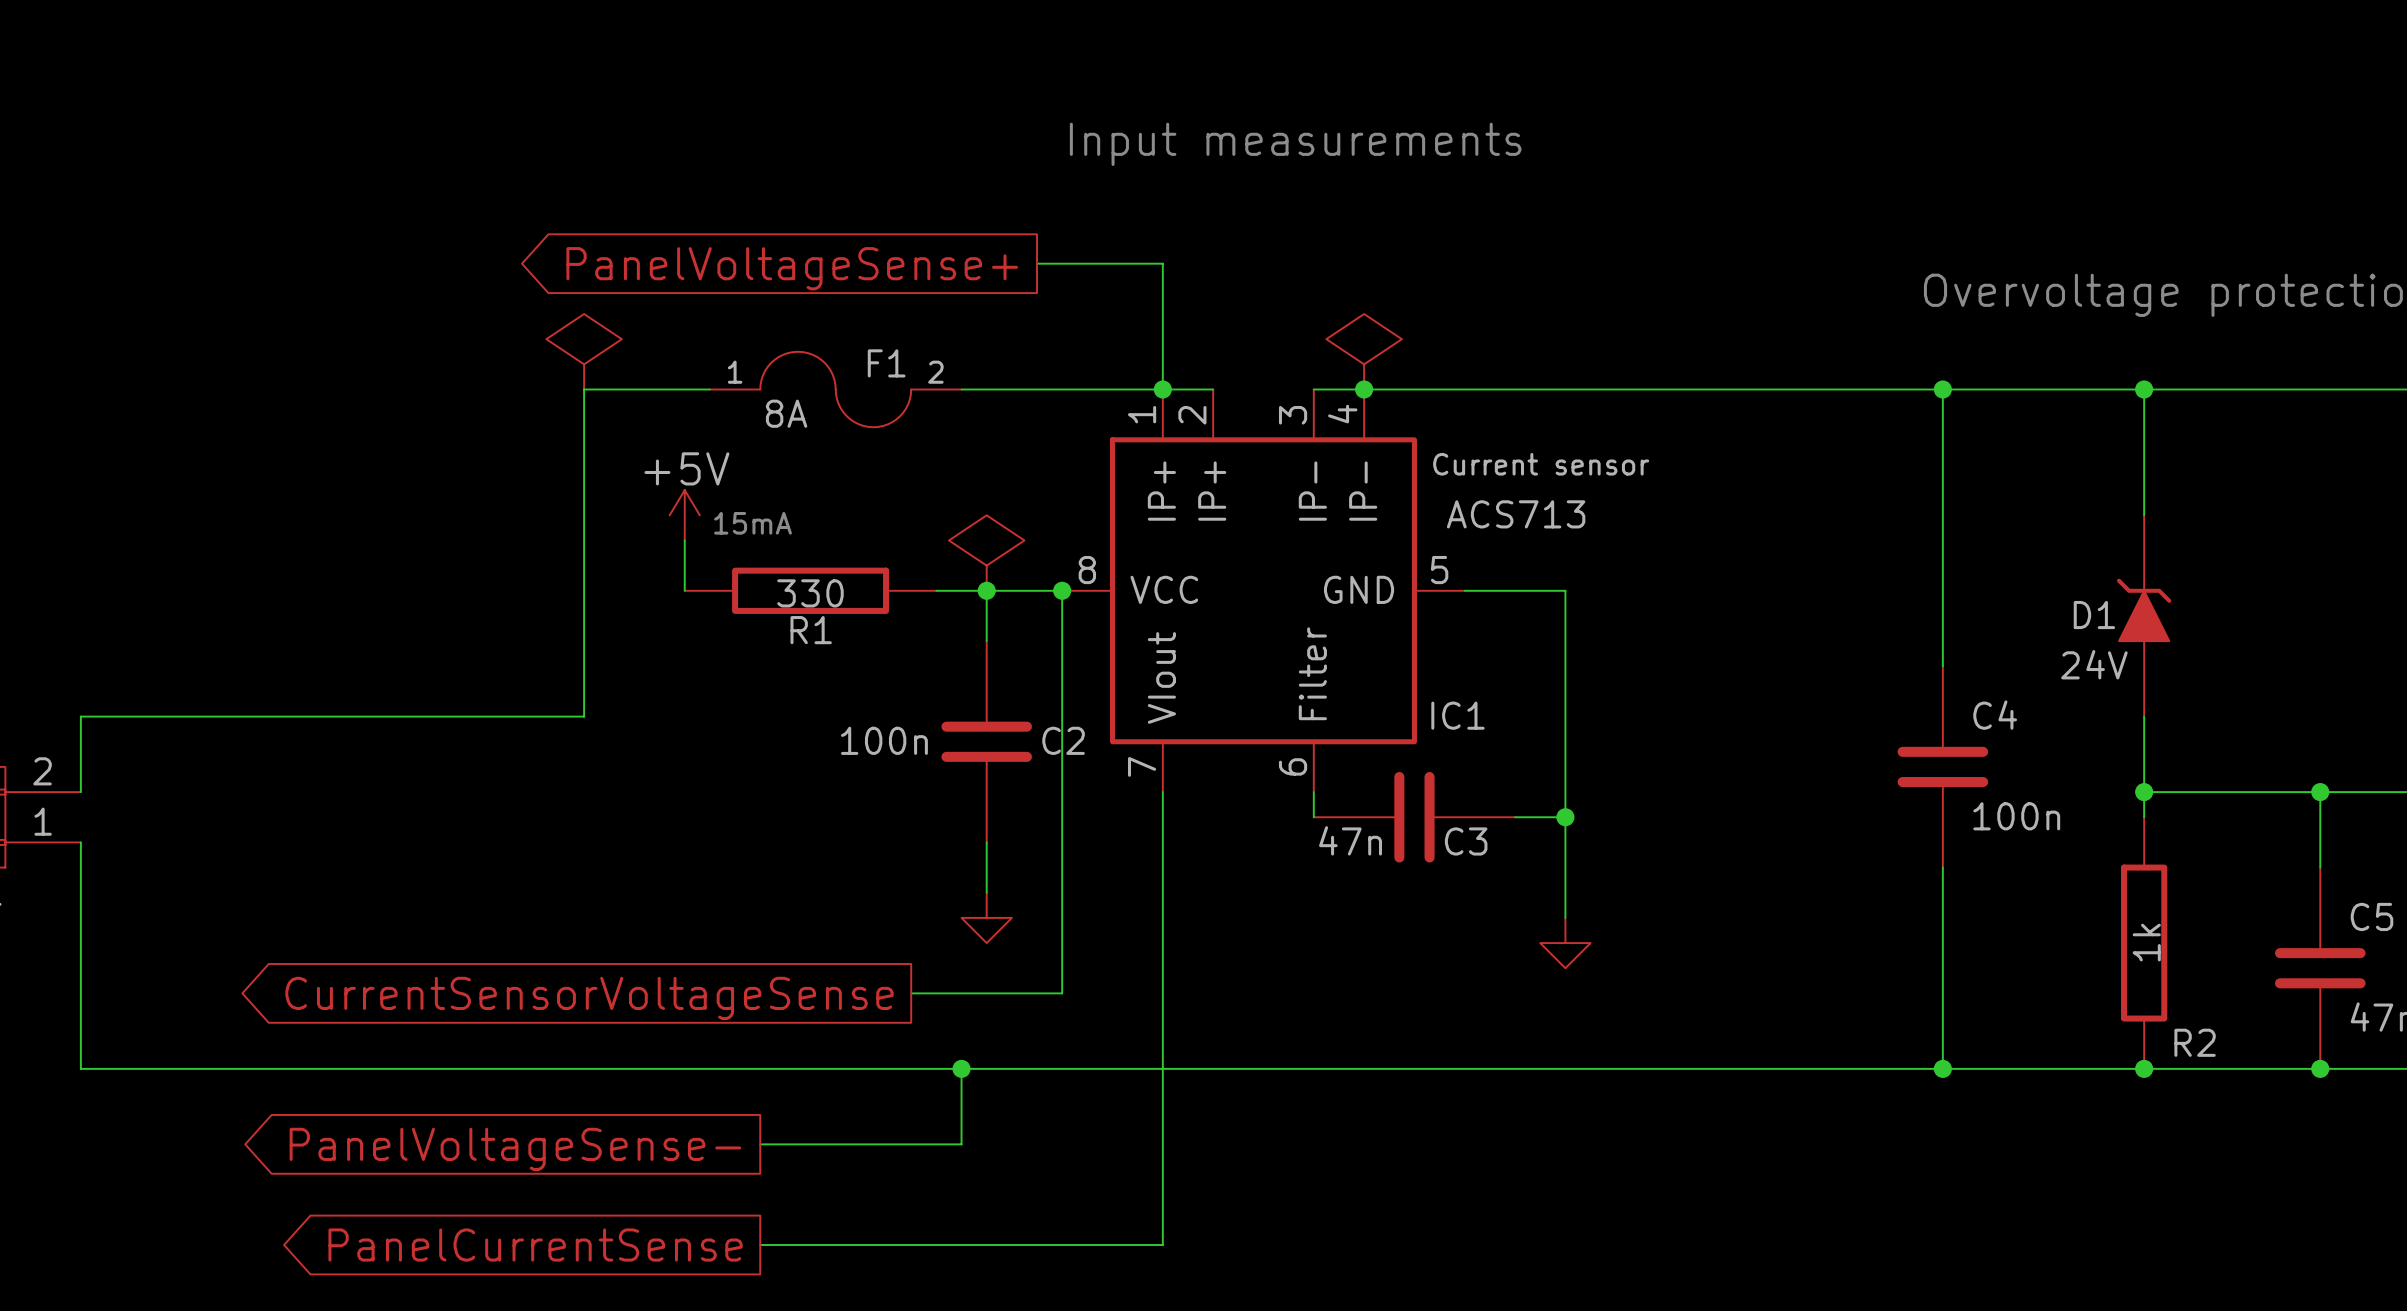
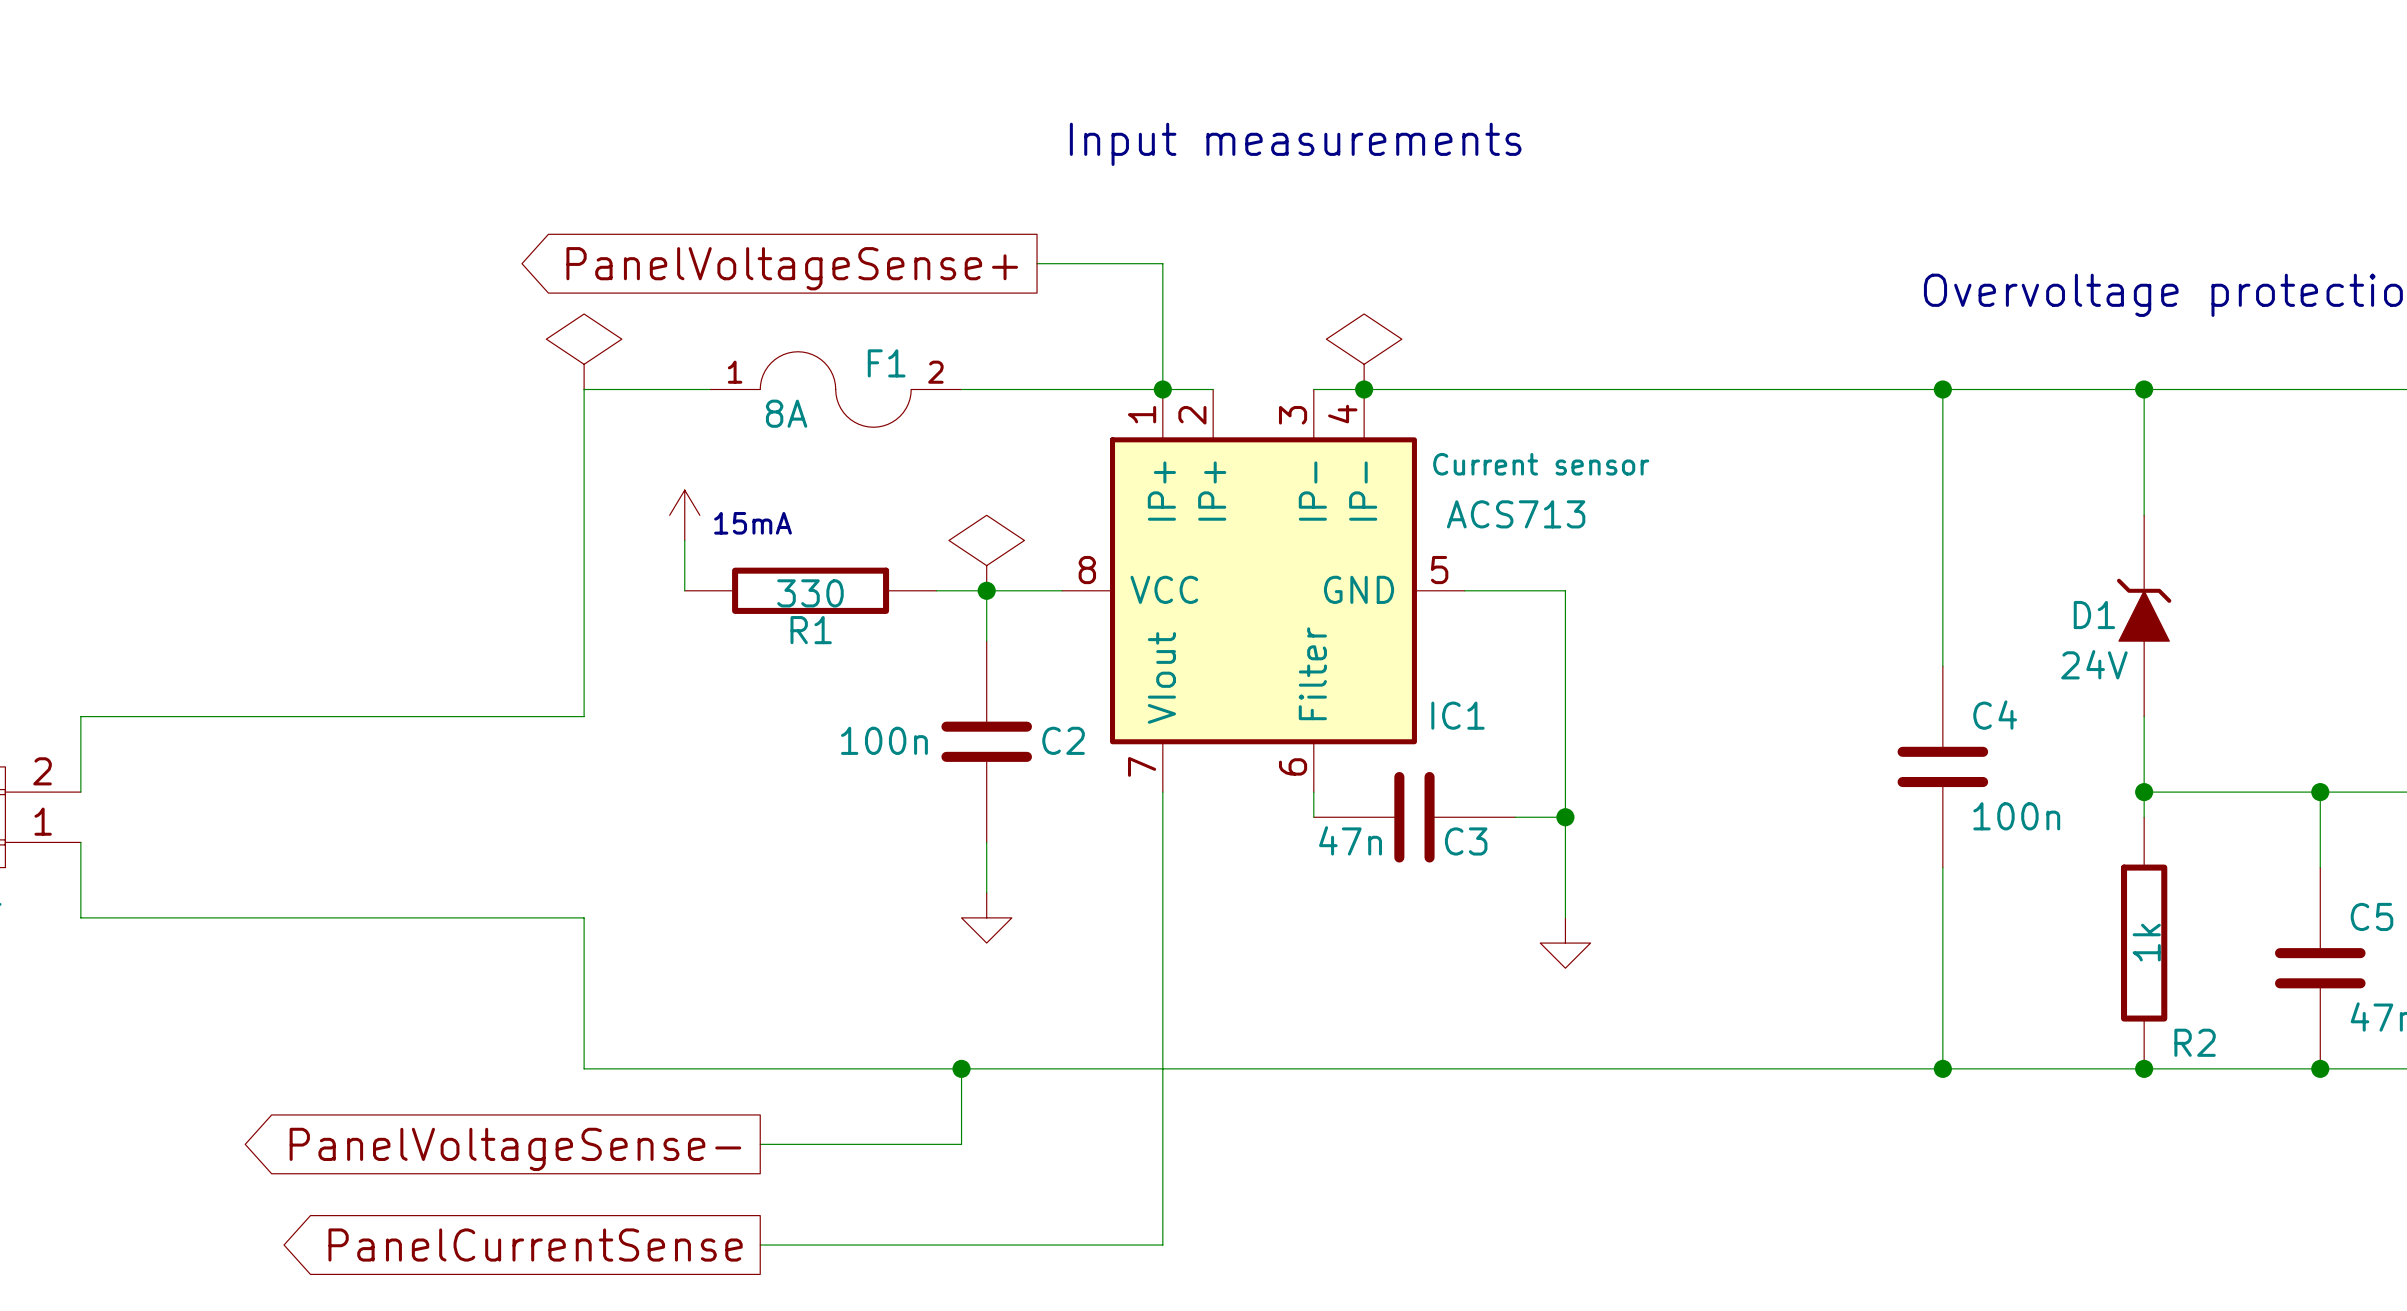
power symbol text: +5V (686, 468) -> none
wire: (1062, 590) (1062, 993) (911, 993) -> none
junction: (1062, 590) -> none
wire: (80, 917) (80, 1068) (584, 1068) -> (80, 917) (584, 917) (584, 1068)
global label: CurrentSensorVoltageSense (589, 998) -> none

